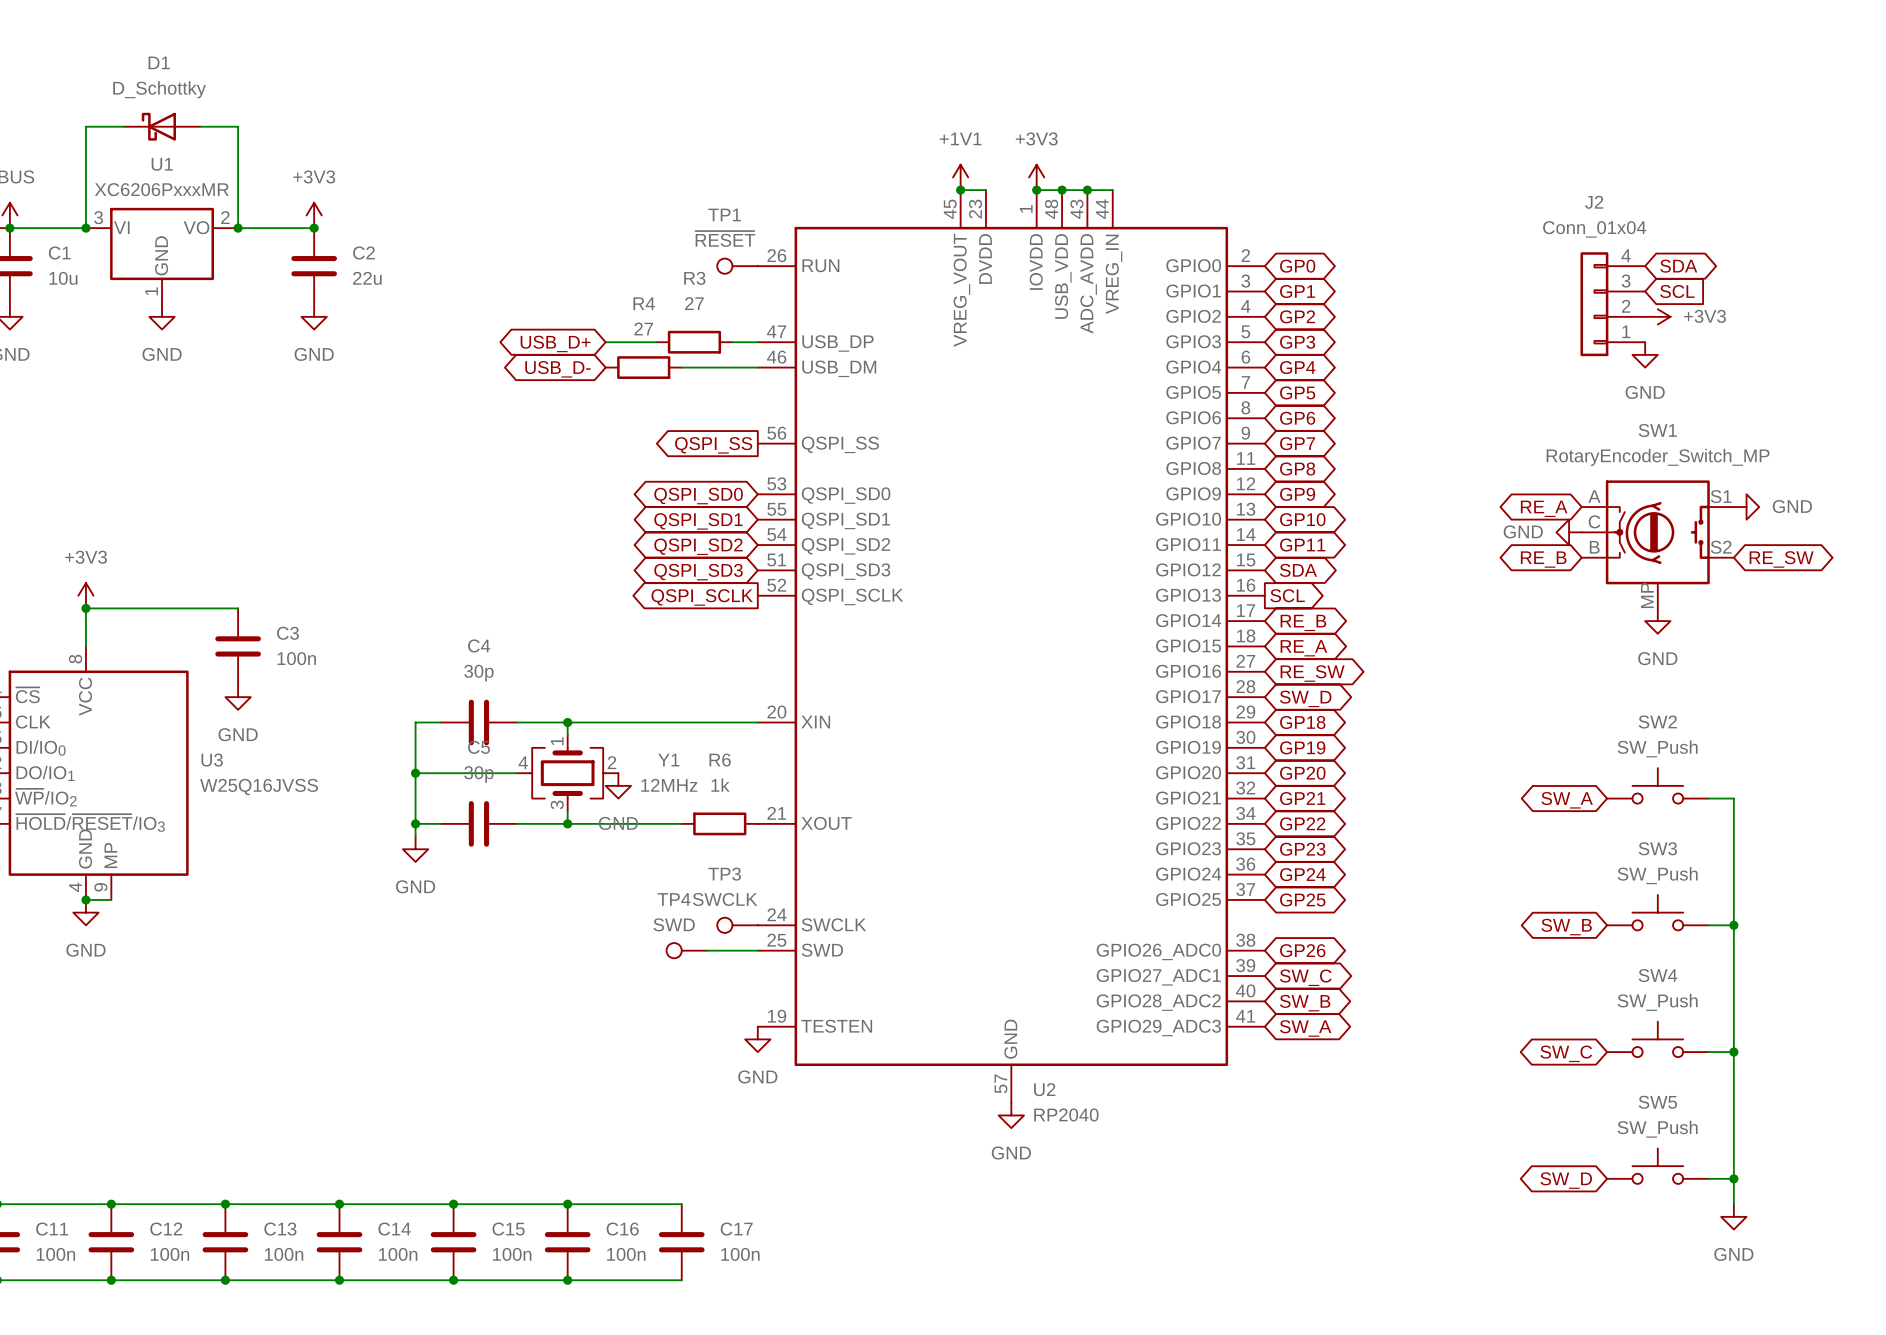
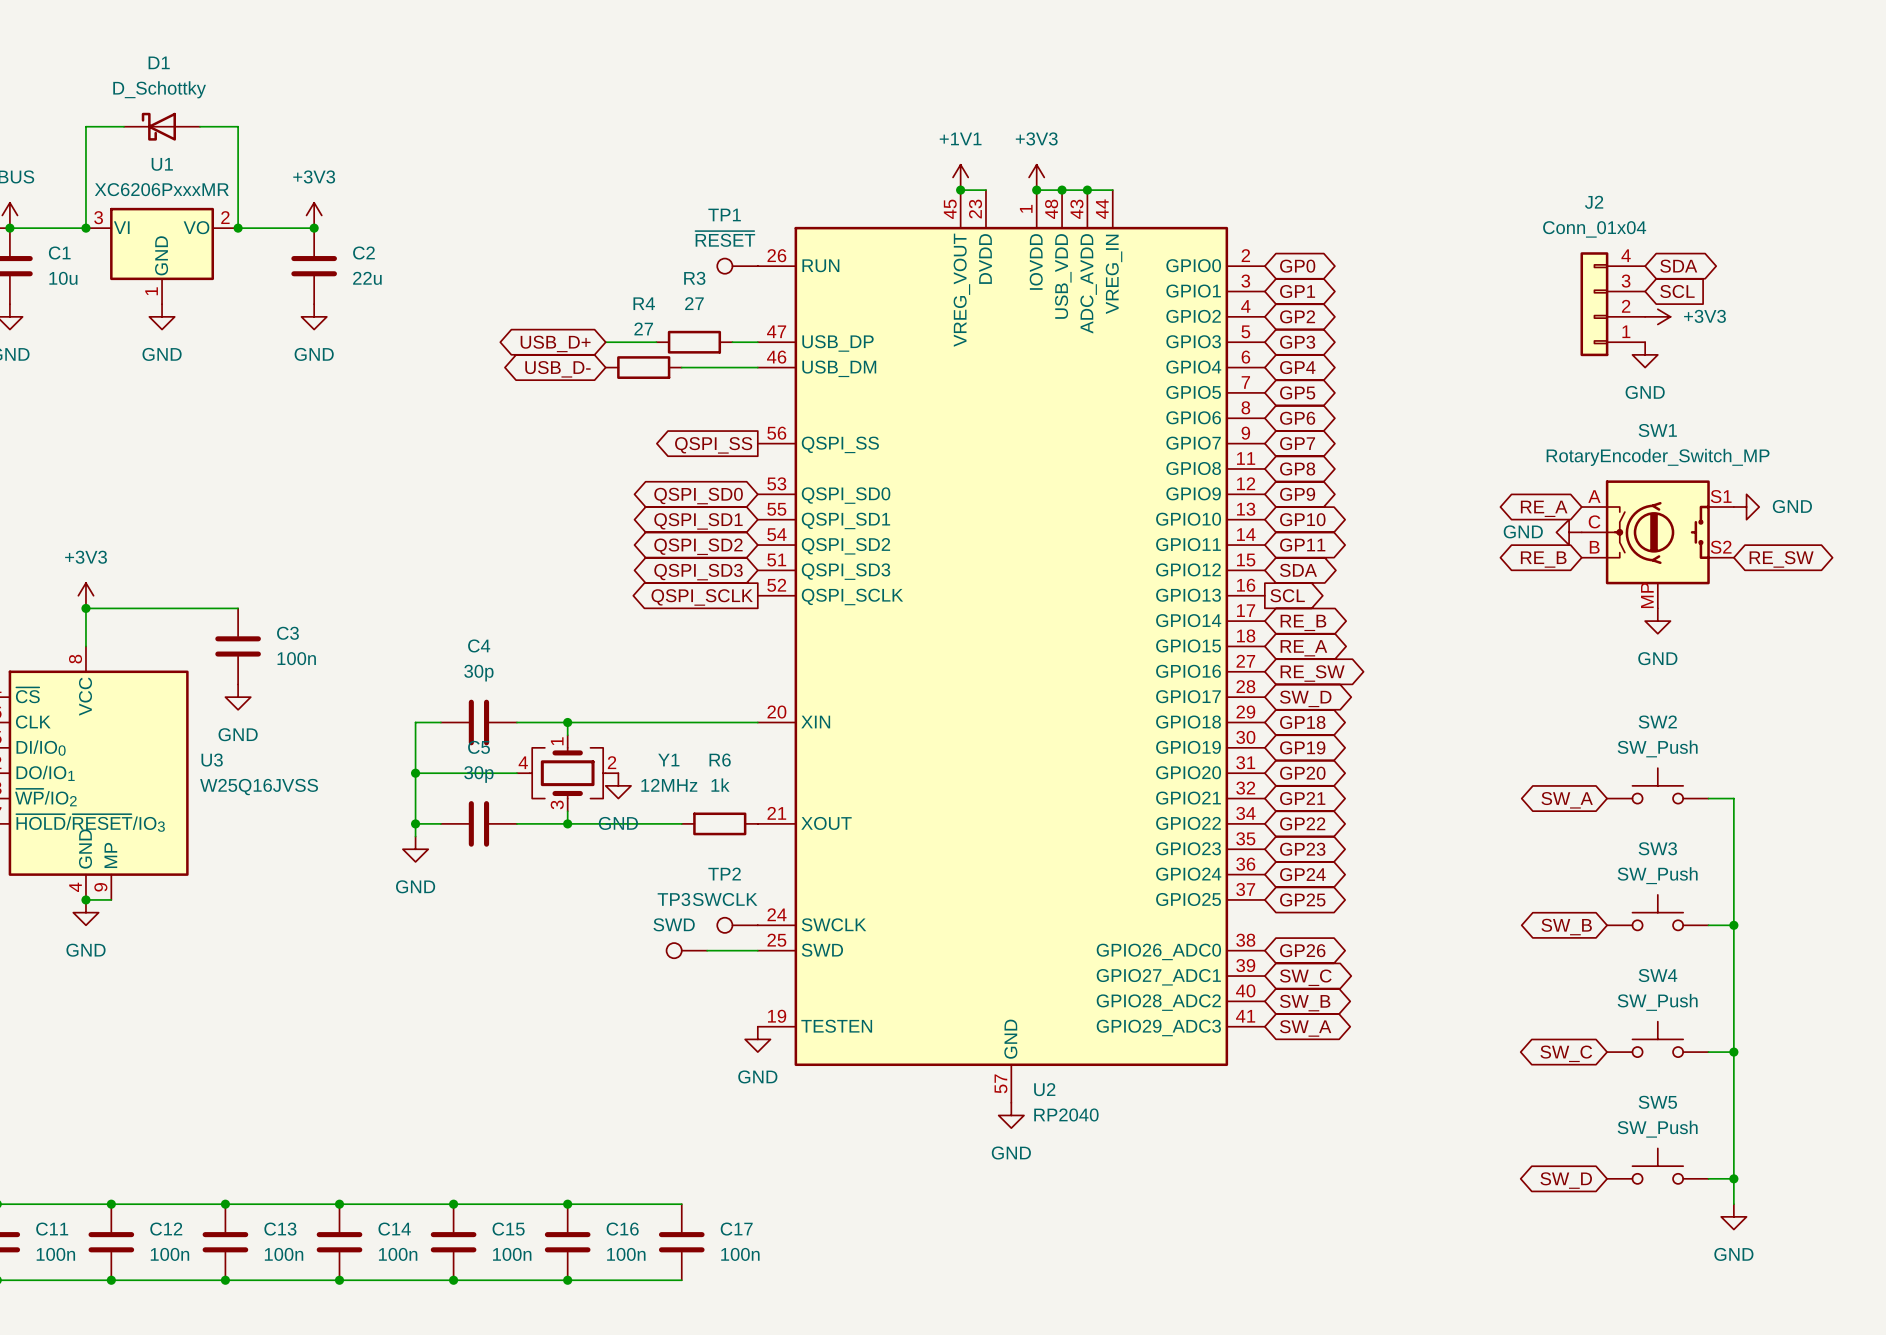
TP3 name: TP3 (724, 874) -> TP2 (724, 874)
TP4 name: TP4 (674, 899) -> TP3 (673, 899)

